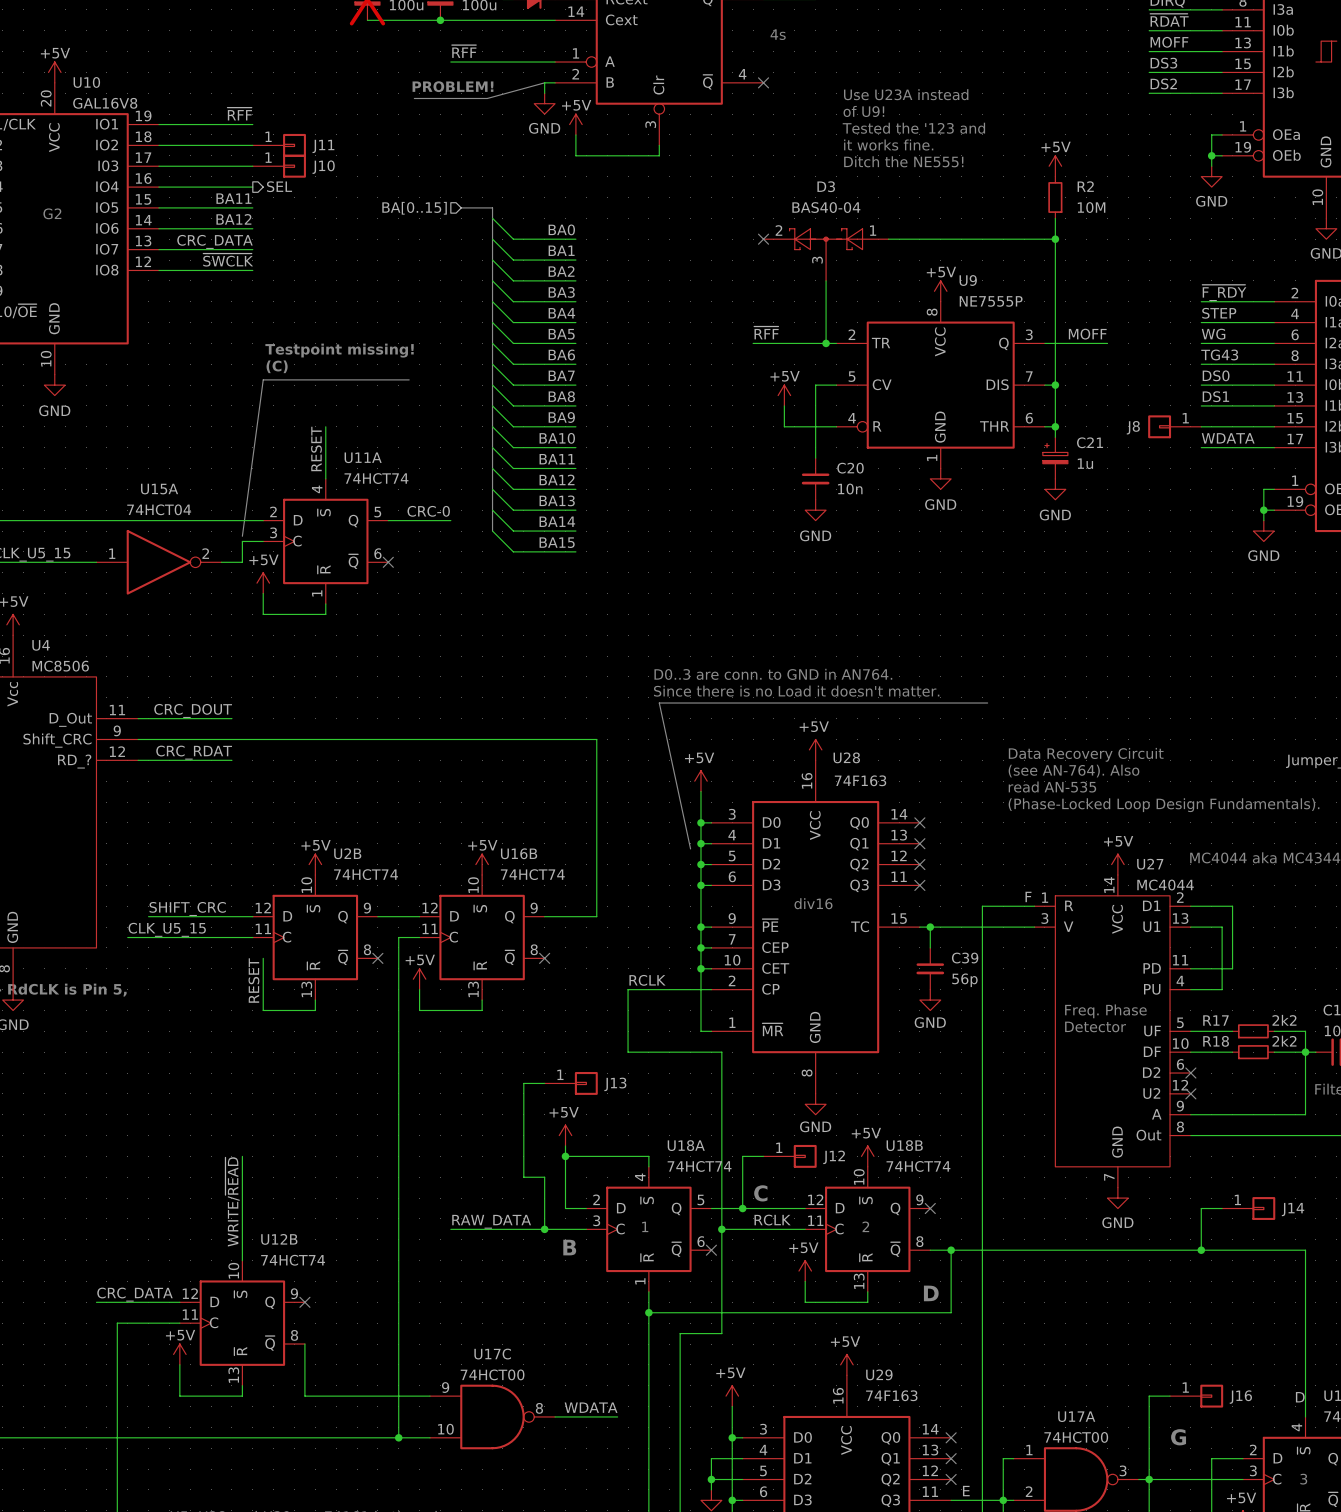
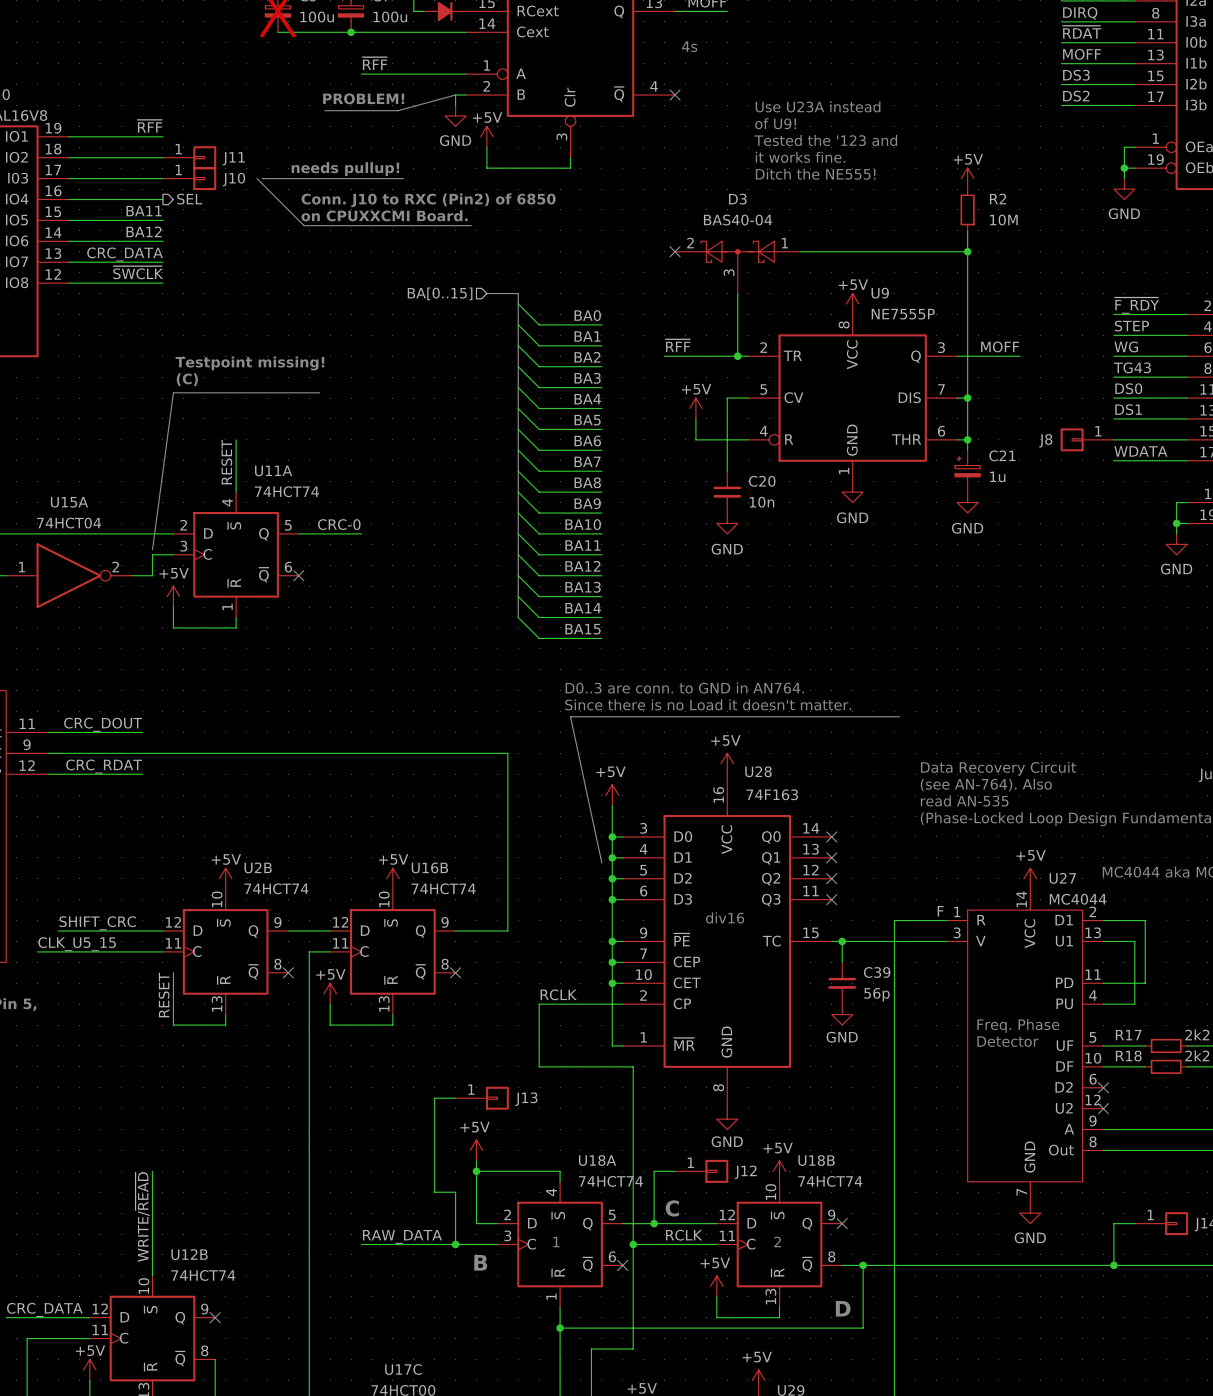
text: none -> needs pullup! (345, 169)
line: none -> (257, 178) (304, 225) (471, 225)
line: none -> (262, 178) (403, 178)
text: none -> Conn. J10 to RXC (Pin2) of 6850 (428, 200)
text: none -> on CPUXXCMI Board. (384, 215)
bus: (461, 207) (492, 207) (492, 531) -> (486, 293) (518, 293) (518, 617)
hierarchical label position: BA[0..15] (414, 208) -> BA[0..15] (440, 293)
wire: (492, 218) (513, 239) (575, 239) -> (518, 304) (539, 324) (601, 324)
label position: BA0 (561, 229) -> BA0 (587, 315)
wire: (492, 239) (513, 260) (575, 260) -> (518, 324) (539, 345) (601, 345)
label position: BA1 (561, 250) -> BA1 (587, 336)
wire: (492, 260) (513, 280) (575, 280) -> (518, 345) (539, 366) (601, 366)
label position: BA2 (561, 271) -> BA2 (587, 357)
wire: (492, 280) (513, 301) (575, 301) -> (518, 366) (539, 387) (601, 387)
label position: BA3 (561, 292) -> BA3 (587, 378)
wire: (492, 301) (513, 322) (575, 322) -> (518, 387) (539, 408) (601, 408)
label position: BA4 (561, 313) -> BA4 (587, 399)
wire: (492, 322) (513, 343) (575, 343) -> (518, 408) (539, 429) (601, 429)
label position: BA5 (561, 334) -> BA5 (587, 420)
wire: (492, 343) (513, 364) (575, 364) -> (518, 429) (539, 450) (601, 450)
label position: BA6 (561, 354) -> BA6 (587, 440)
wire: (492, 364) (513, 385) (575, 385) -> (518, 450) (539, 471) (601, 471)
label position: BA7 (561, 375) -> BA7 (587, 461)
wire: (492, 385) (513, 405) (575, 405) -> (518, 471) (539, 492) (601, 492)
label position: BA8 (561, 396) -> BA8 (587, 482)
wire: (492, 405) (513, 426) (575, 426) -> (518, 492) (539, 513) (601, 513)
label position: BA9 (561, 417) -> BA9 (587, 503)
wire: (492, 426) (513, 447) (575, 447) -> (518, 513) (539, 533) (601, 533)
label position: BA10 (557, 438) -> BA10 (583, 524)
wire: (492, 447) (513, 468) (575, 468) -> (518, 533) (539, 554) (601, 554)
label position: BA11 (557, 459) -> BA11 (582, 545)
wire: (492, 468) (513, 489) (575, 489) -> (518, 554) (539, 575) (601, 575)
label position: BA12 (557, 479) -> BA12 (582, 566)
wire: (492, 489) (513, 510) (575, 510) -> (518, 575) (539, 596) (601, 596)
label position: BA13 (557, 500) -> BA13 (583, 587)
wire: (492, 510) (513, 531) (575, 531) -> (518, 596) (539, 617) (601, 617)
label position: BA14 (557, 521) -> BA14 (583, 608)
wire: (492, 531) (513, 551) (575, 551) -> (518, 617) (539, 638) (601, 638)
label position: BA15 (557, 542) -> BA15 (583, 629)

